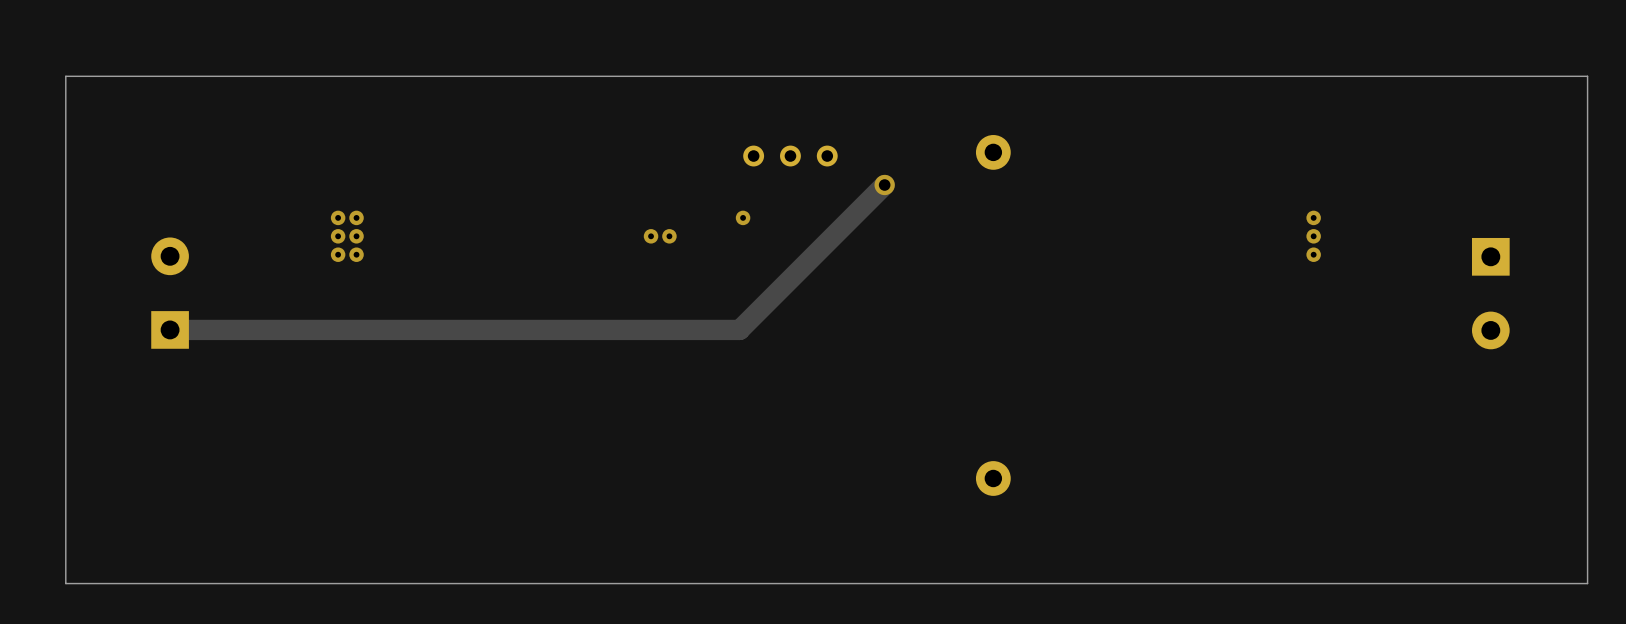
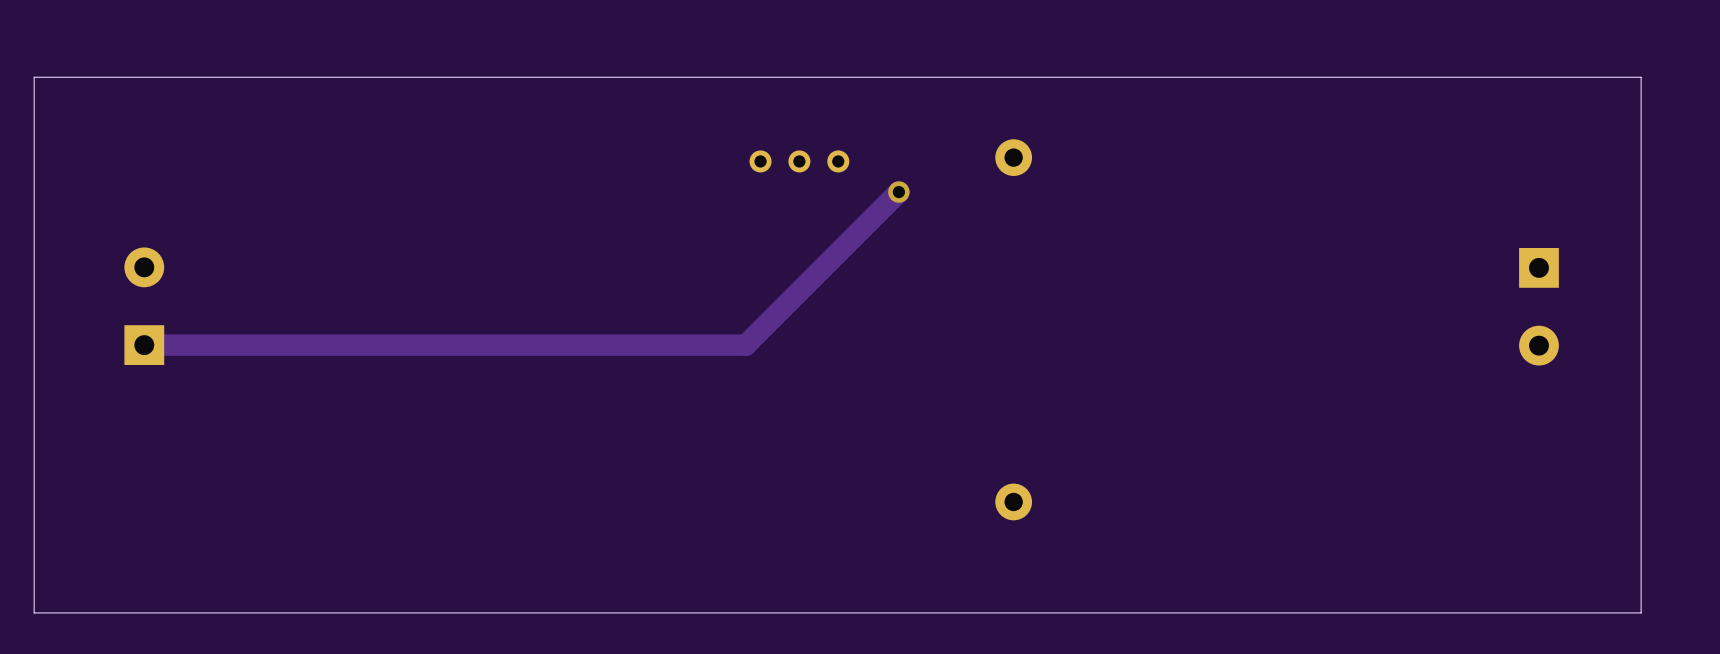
via: (338, 217) -> none
via: (356, 217) -> none
via: (743, 217) -> none
via: (1313, 217) -> none
via: (338, 236) -> none
via: (356, 236) -> none
via: (651, 236) -> none
via: (669, 236) -> none
via: (1313, 236) -> none
via: (338, 254) -> none
via: (356, 254) -> none
via: (1313, 254) -> none

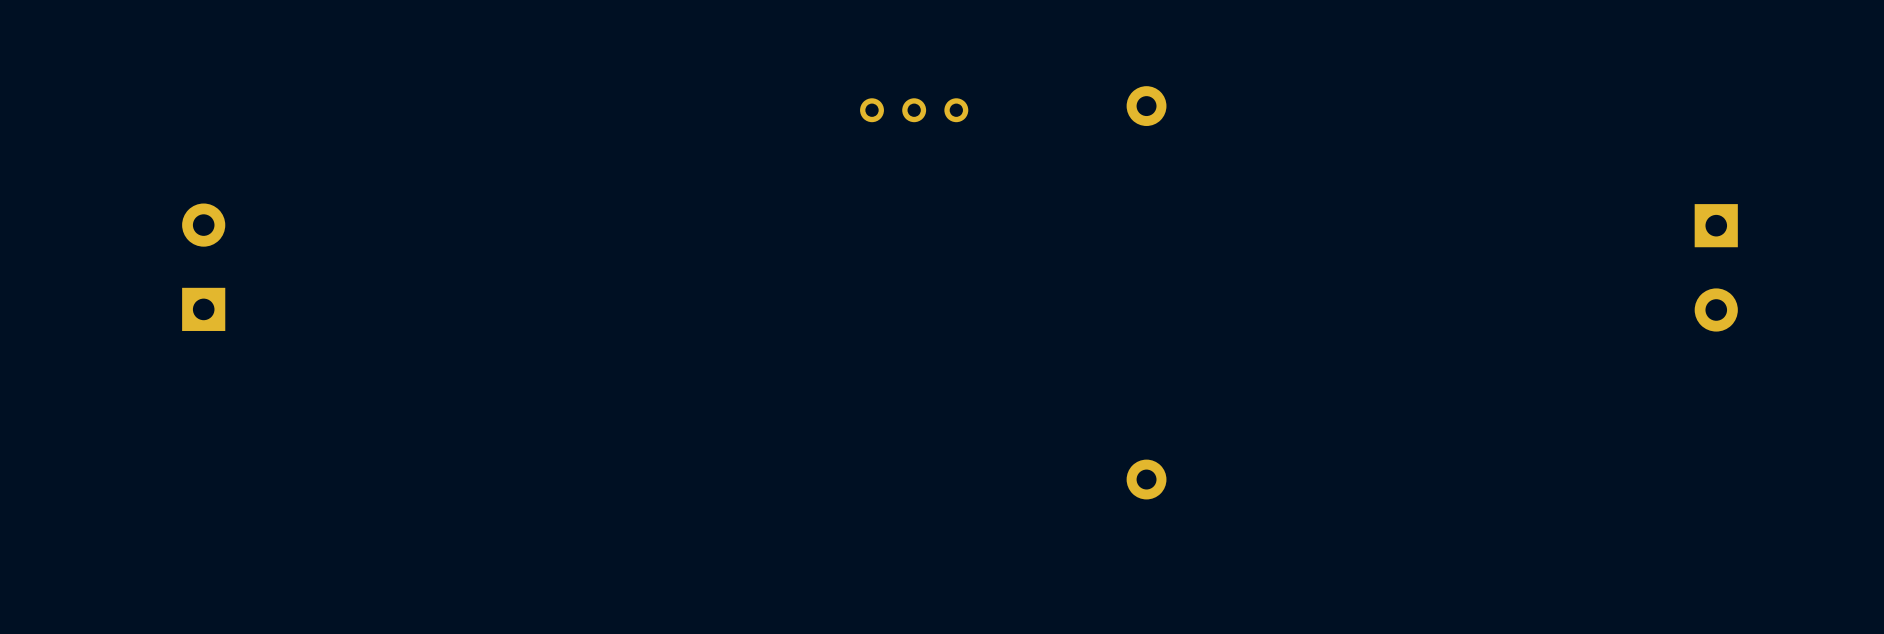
board edge: (1641, 77) (34, 77) (34, 612) (1641, 612) (1641, 77) -> none
track: (898, 192) (745, 345) (144, 345) -> none
via: (898, 192) -> none

